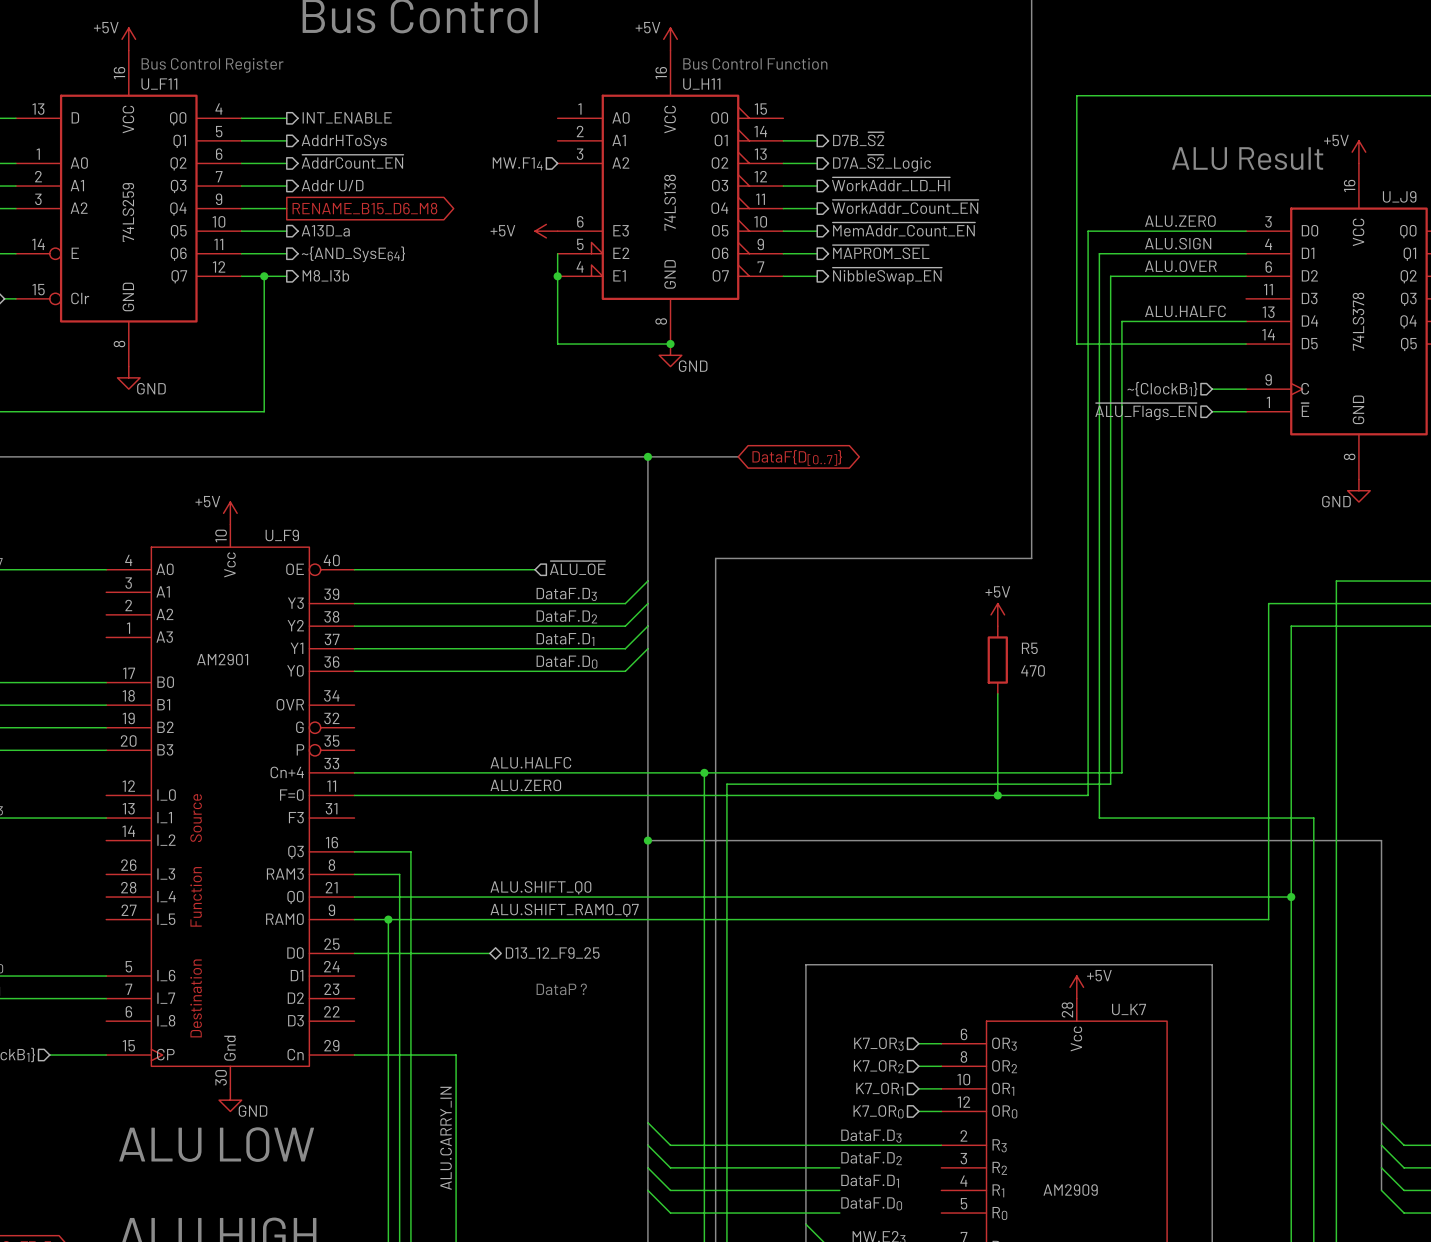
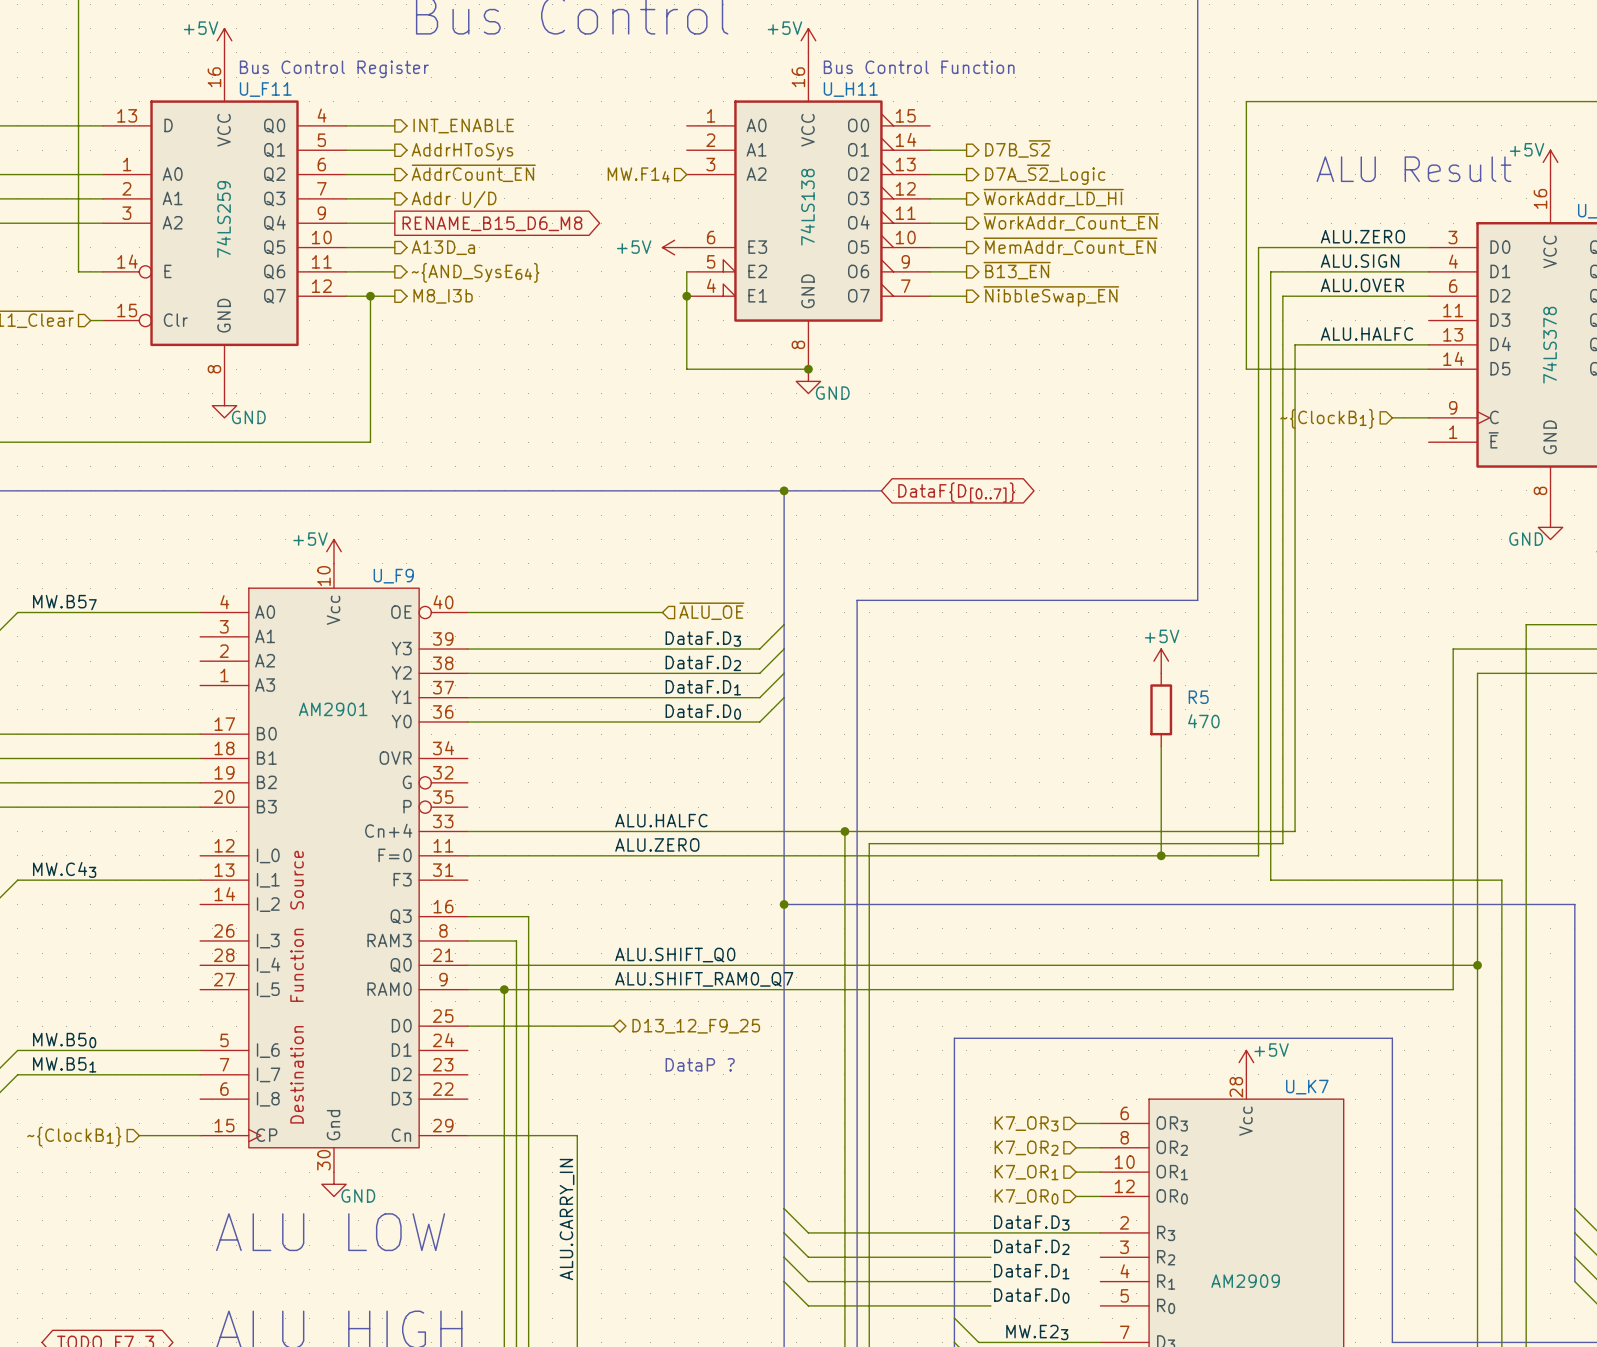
hierarchical label: ~{MAPROM_SEL} (881, 252) -> ~{B13_EN} (1017, 270)
hierarchical label: ~{ALU_Flags_EN} (1146, 411) -> none
wire: (1212, 411) (1246, 411) -> none

